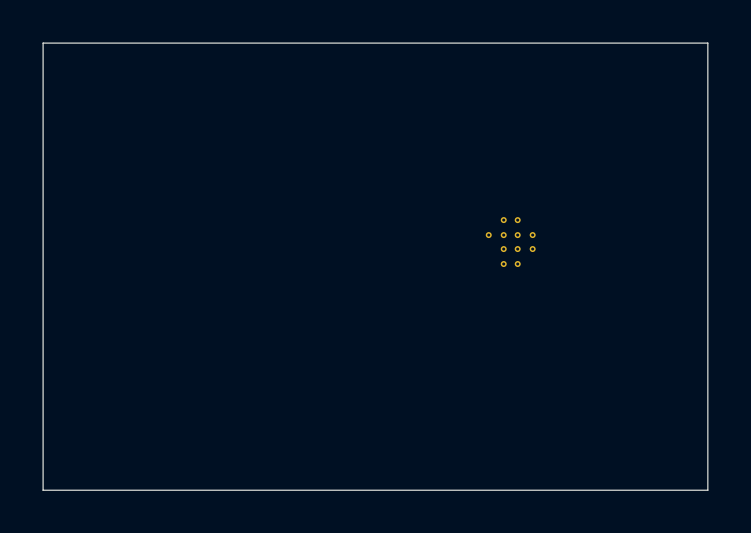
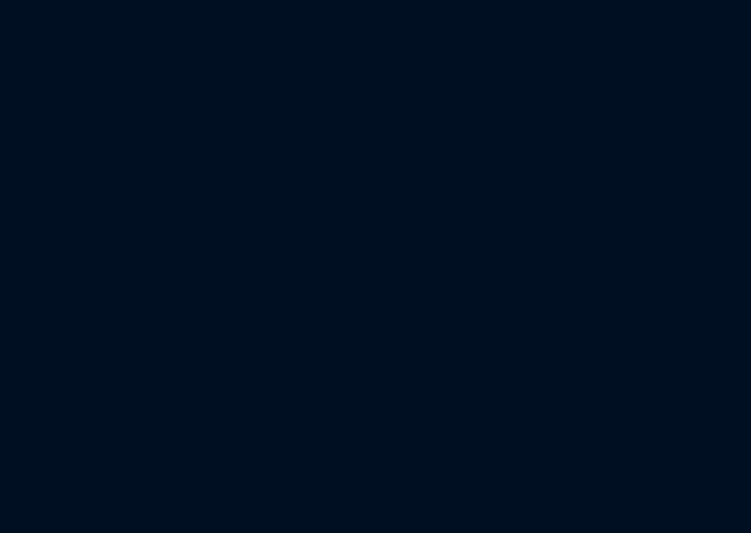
board edge: (707, 43) (43, 43) (43, 490) (707, 490) (707, 43) -> none
part: (510, 242) -> none

